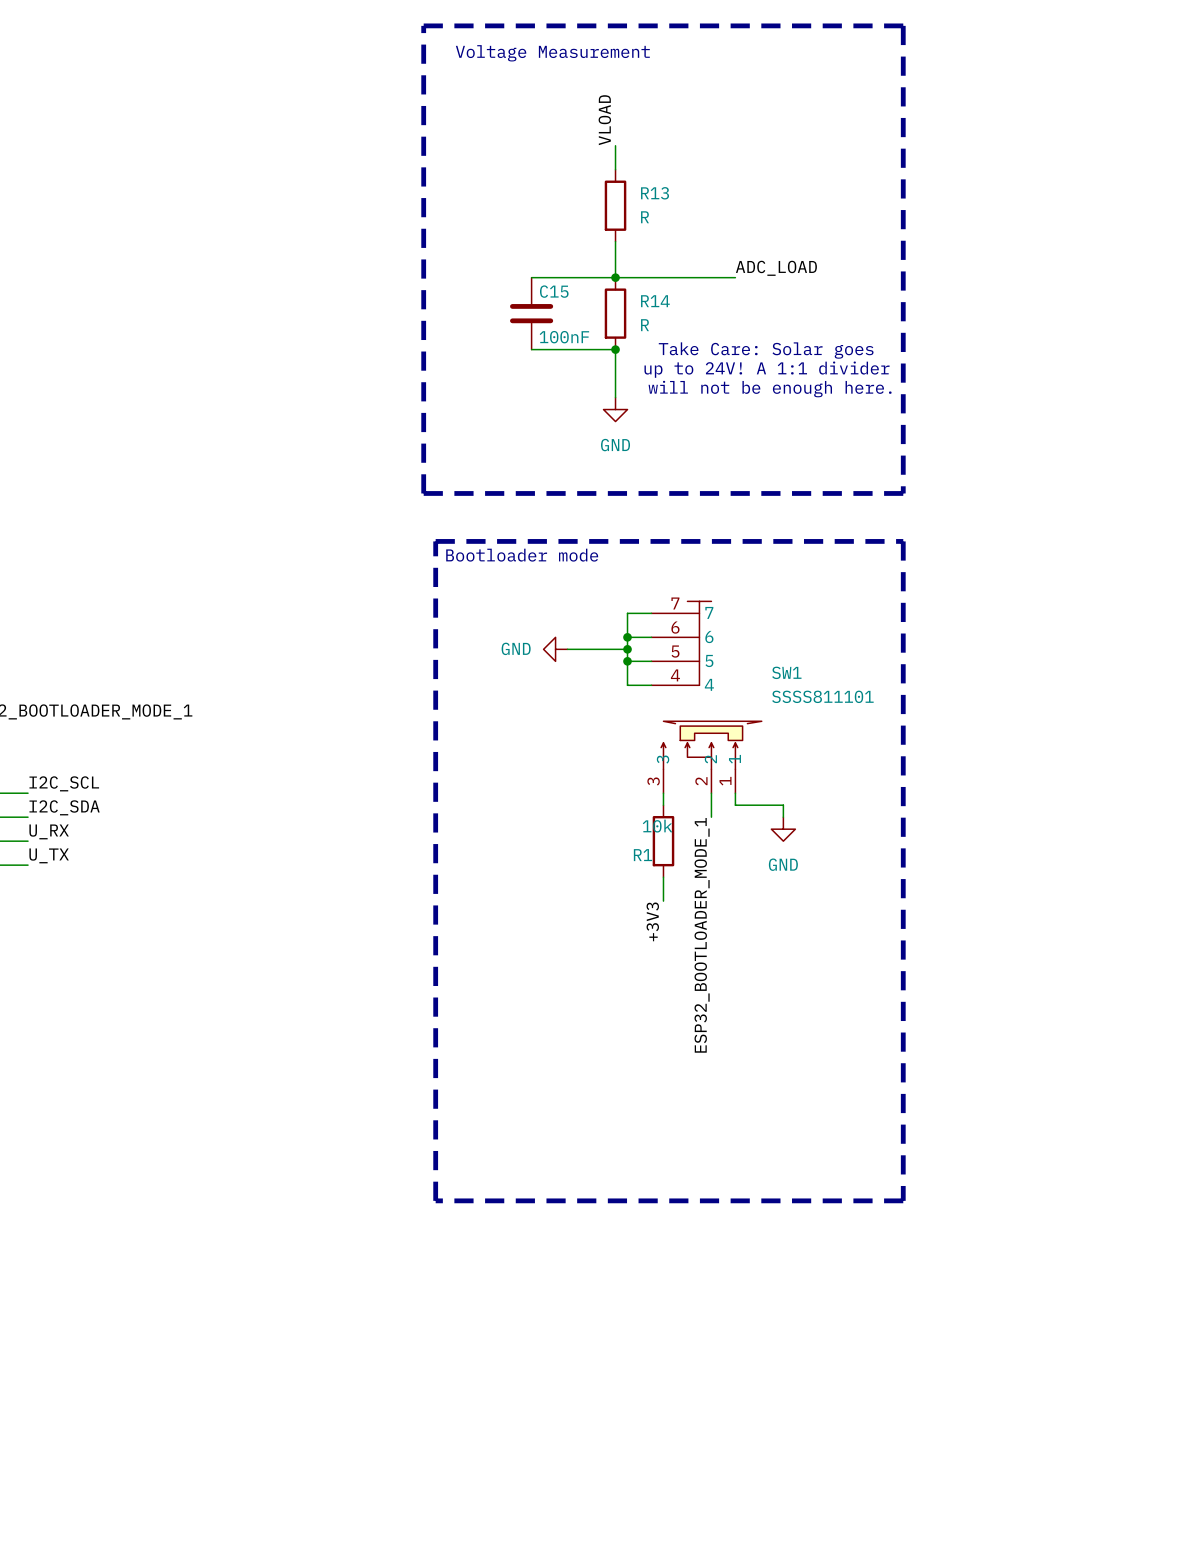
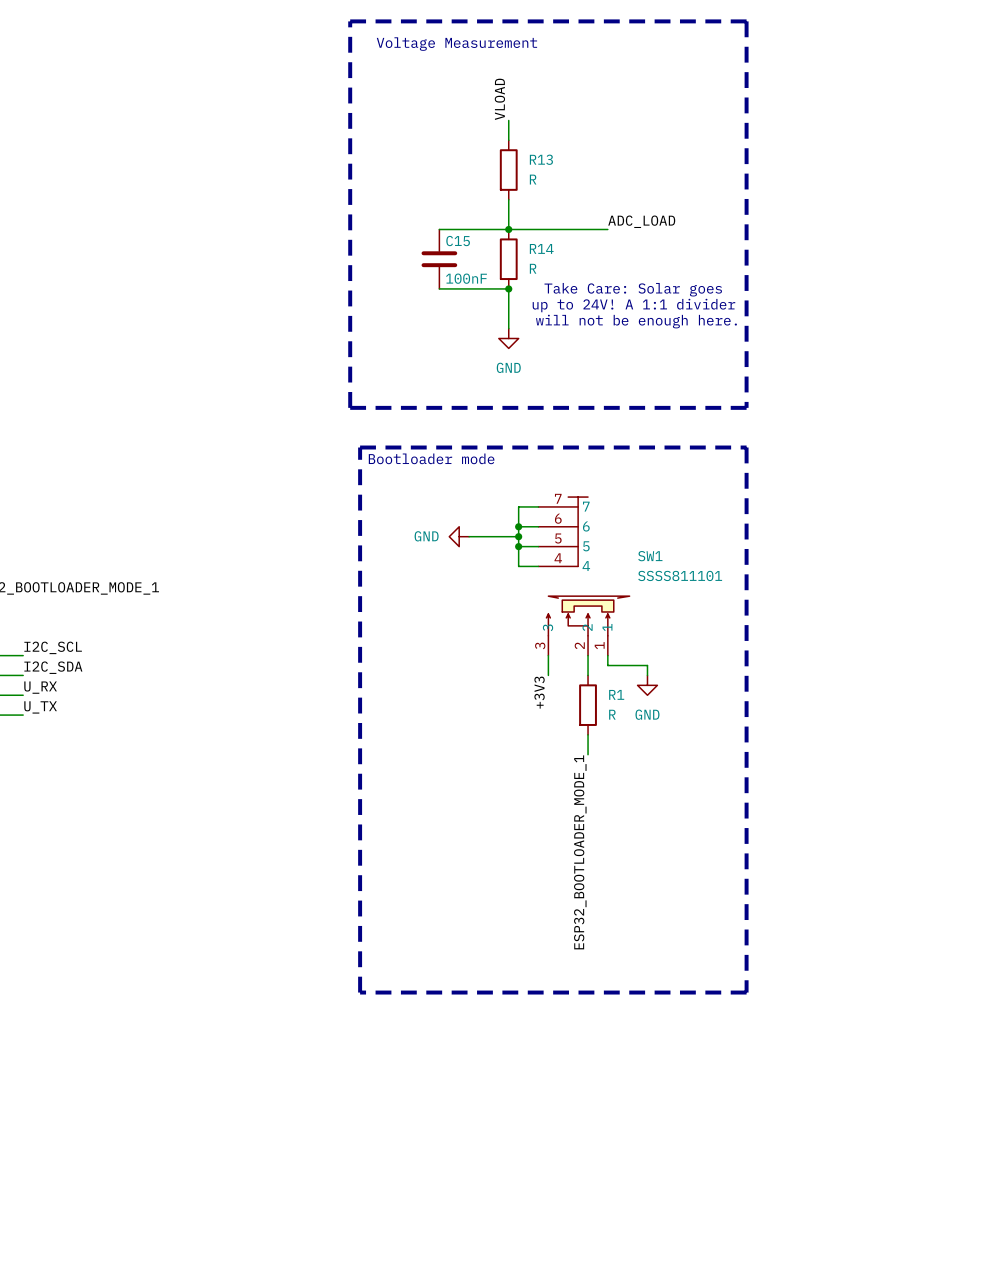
R1 value: 10k (657, 826) -> R (612, 714)
R1 position: (663, 841) -> (588, 705)
R1 name position: R1 (642, 855) -> R1 (616, 694)
wire: (663, 877) (663, 901) -> (588, 734) (588, 754)
label position: +3V3 (652, 921) -> +3V3 (539, 692)
label position: ESP32_BOOTLOADER_MODE_1 (702, 935) -> ESP32_BOOTLOADER_MODE_1 (580, 852)

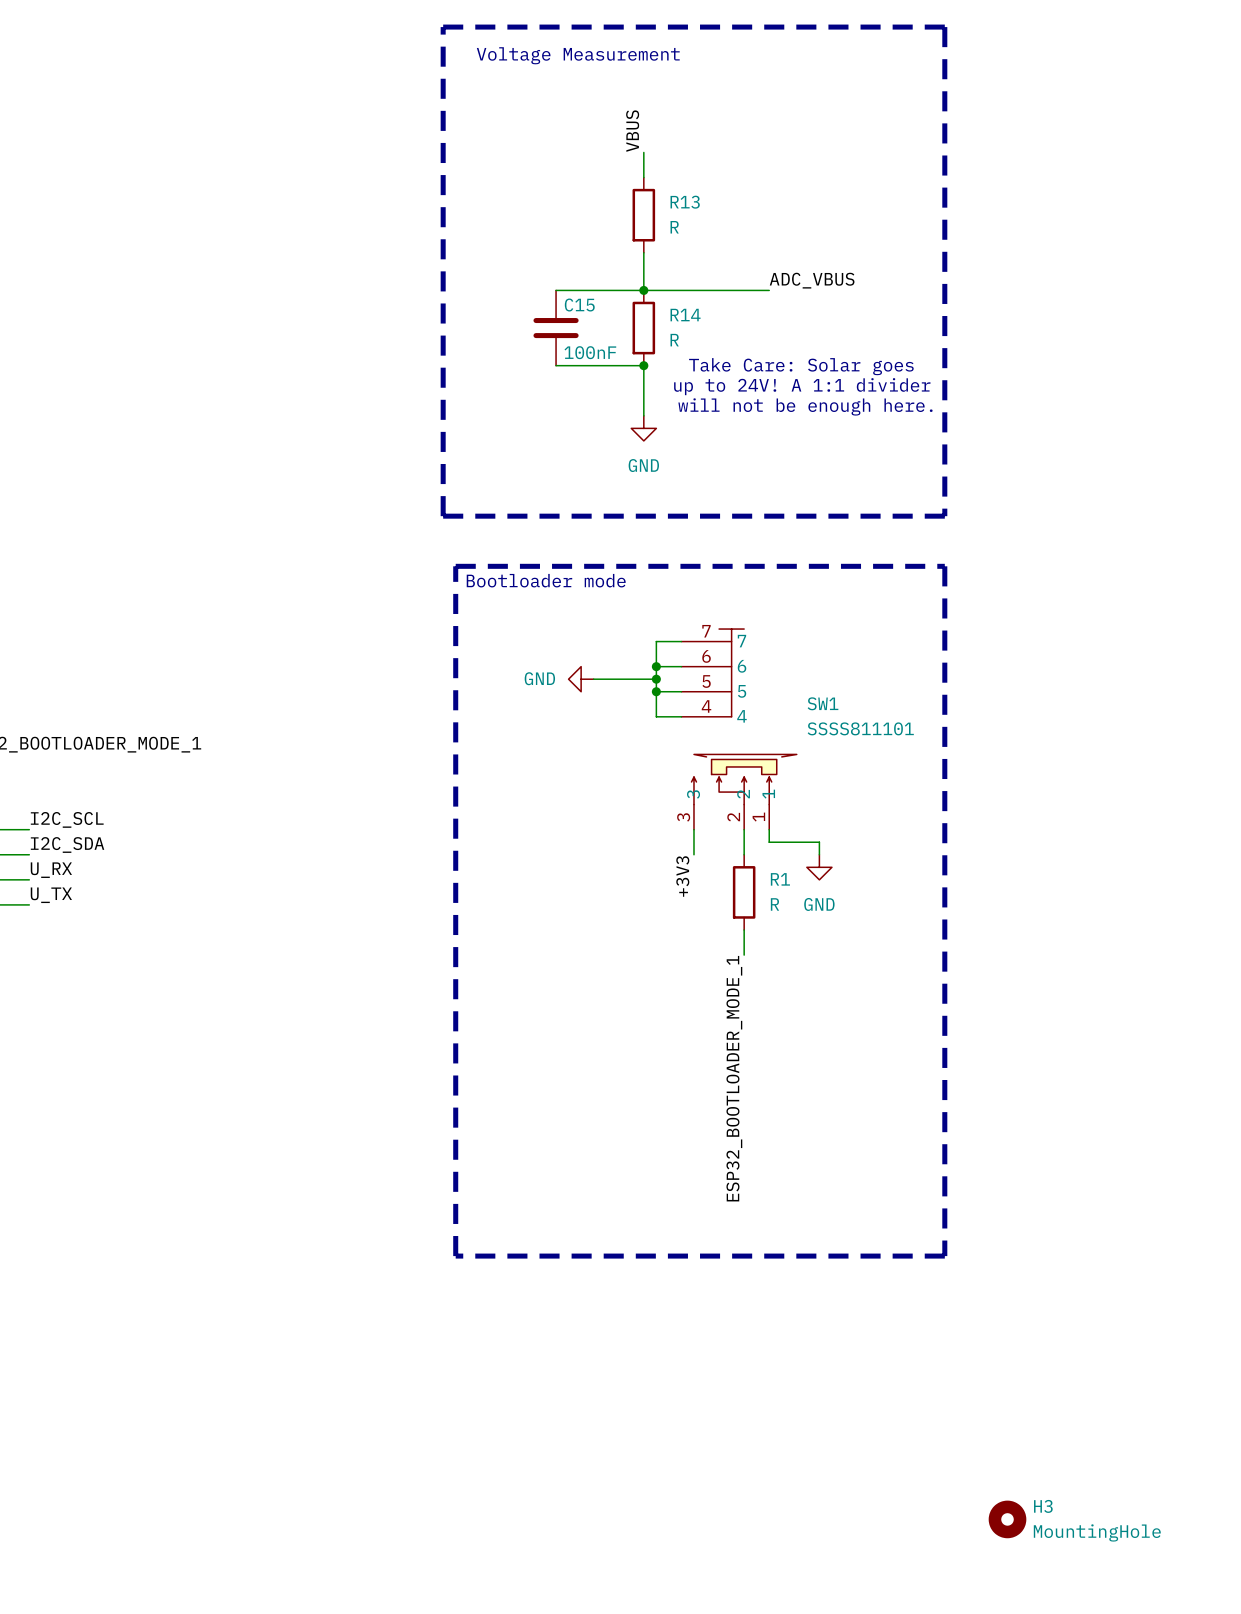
label: VLOAD (499, 99) -> VBUS (632, 131)
label: ADC_LOAD (641, 221) -> ADC_VBUS (812, 280)
H3: none -> MountingHole (1007, 1519)

